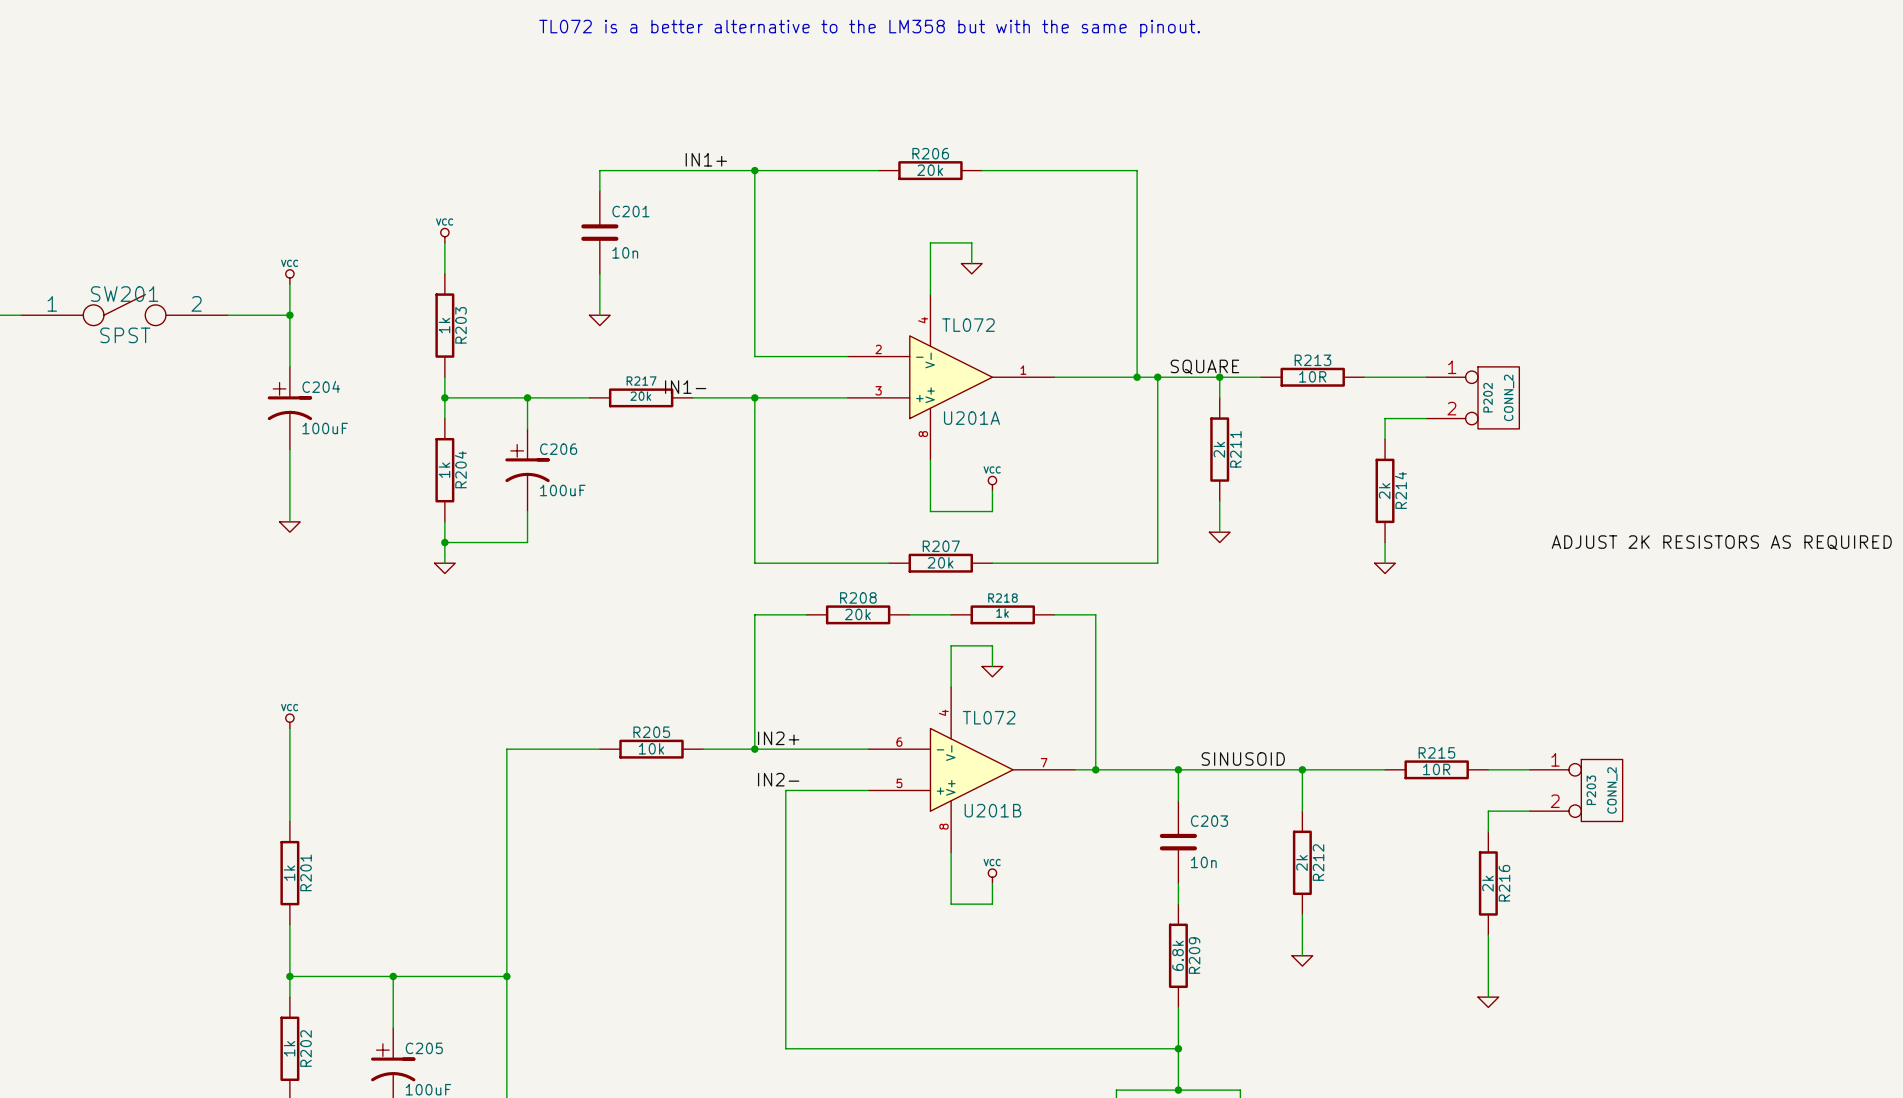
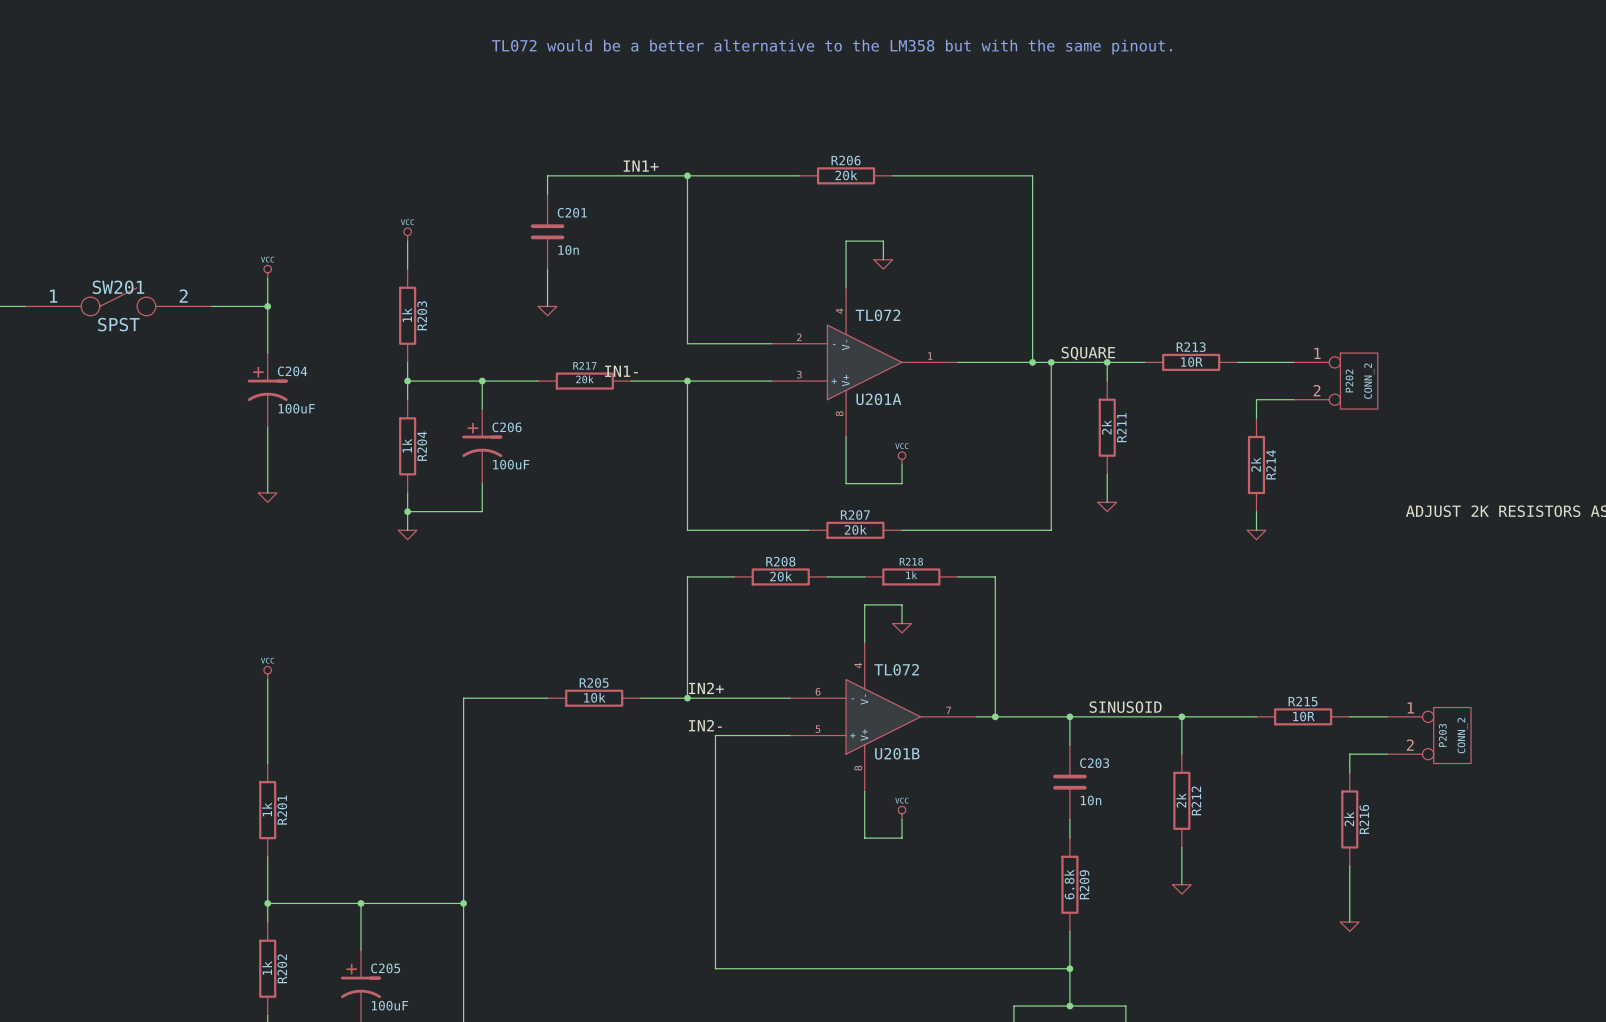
text: TL072 is a better alternative to the LM358 but with the same pinout. (869, 28) -> TL072 would be a better alternative to the LM358 but with the same pinout. (831, 47)

